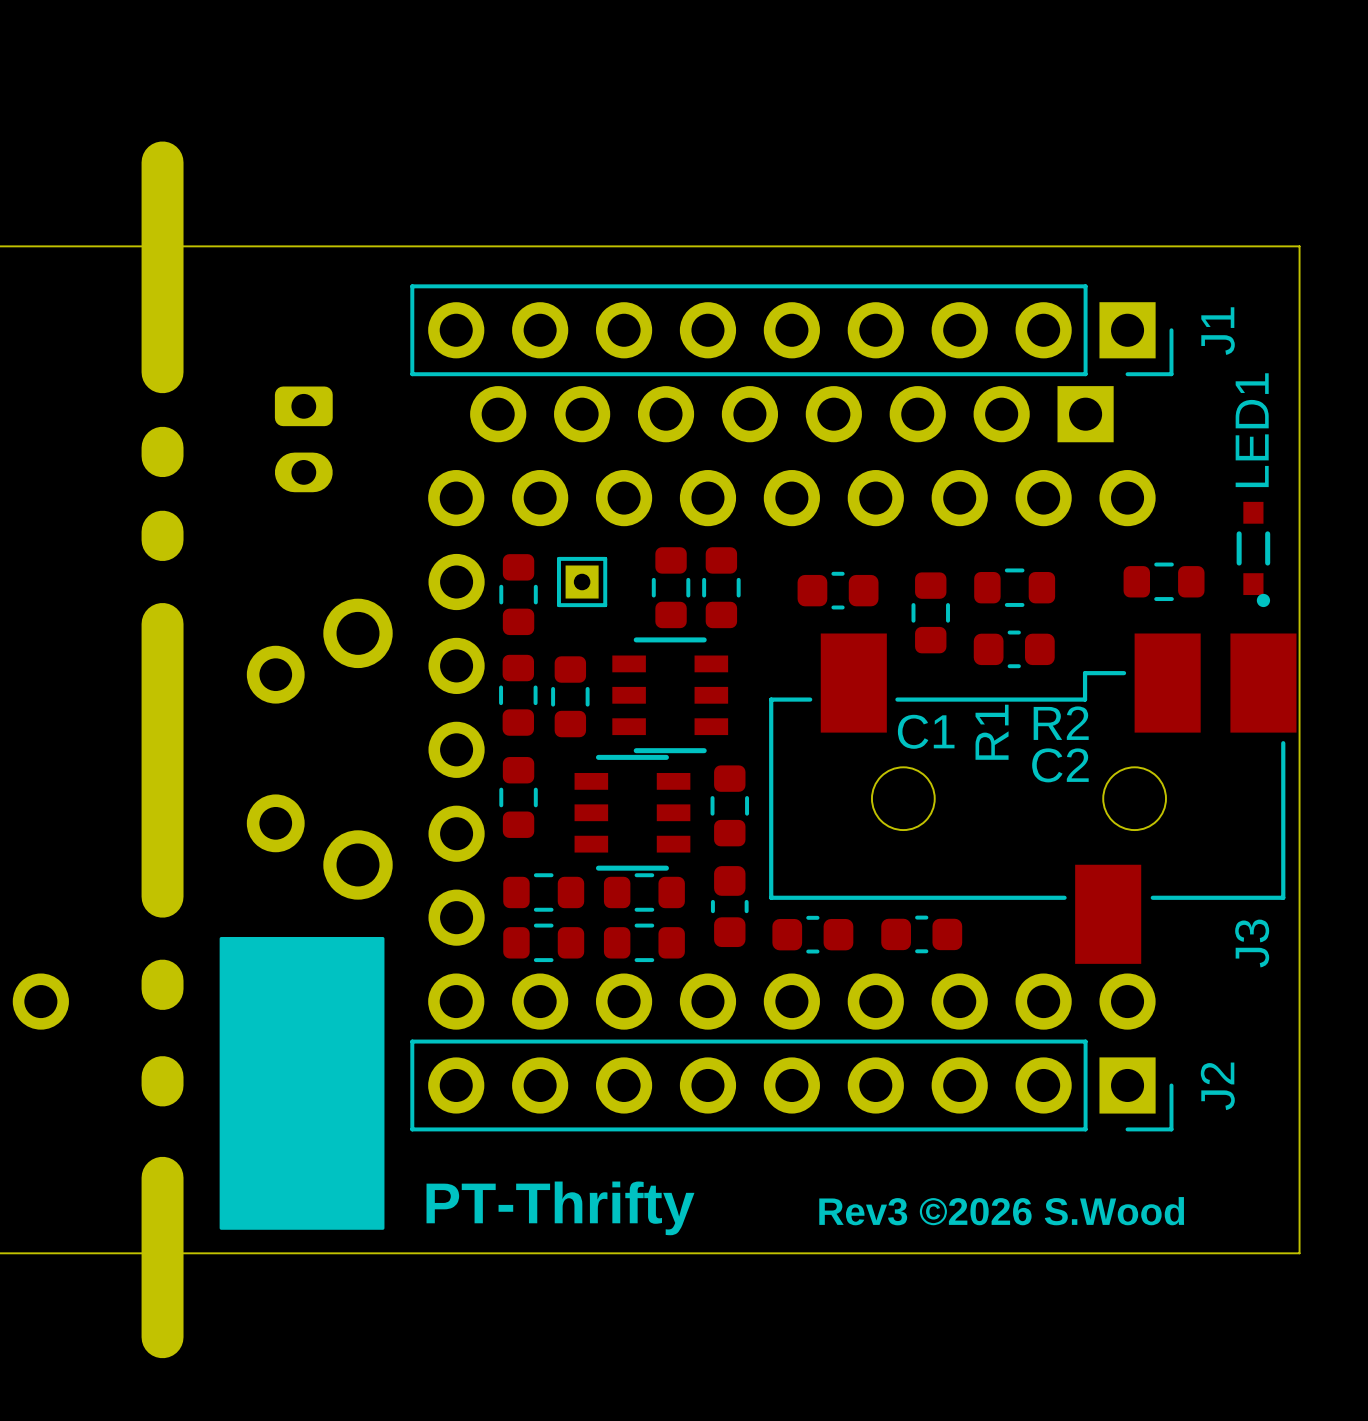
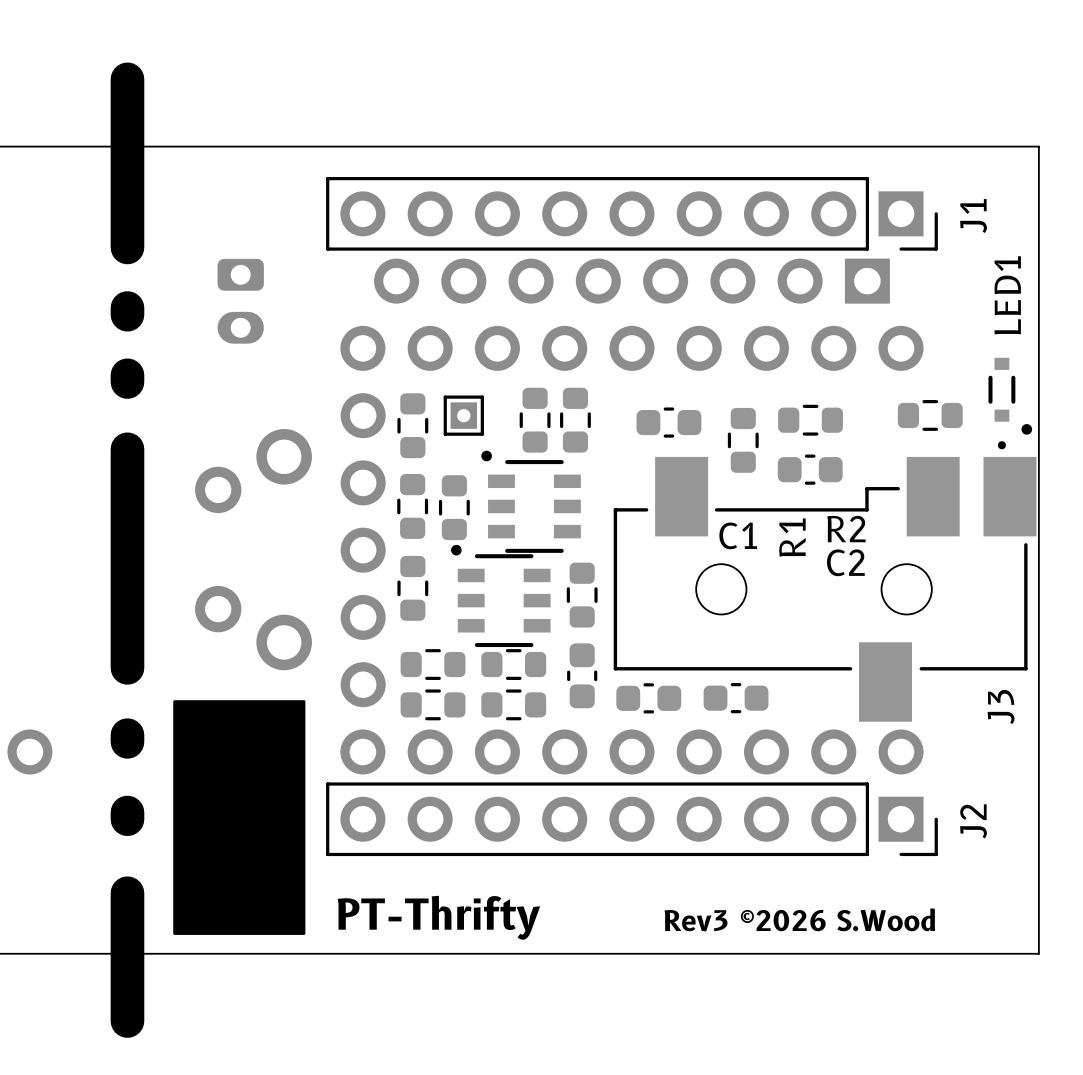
LED1 footprint: [1236, 501, 1271, 596] -> [988, 357, 1016, 450]
J3 footprint: [769, 593, 1297, 964] -> [613, 424, 1037, 722]
part footprint: [612, 637, 729, 754] -> [481, 450, 581, 553]
part footprint: [574, 754, 691, 871] -> [451, 544, 551, 648]

